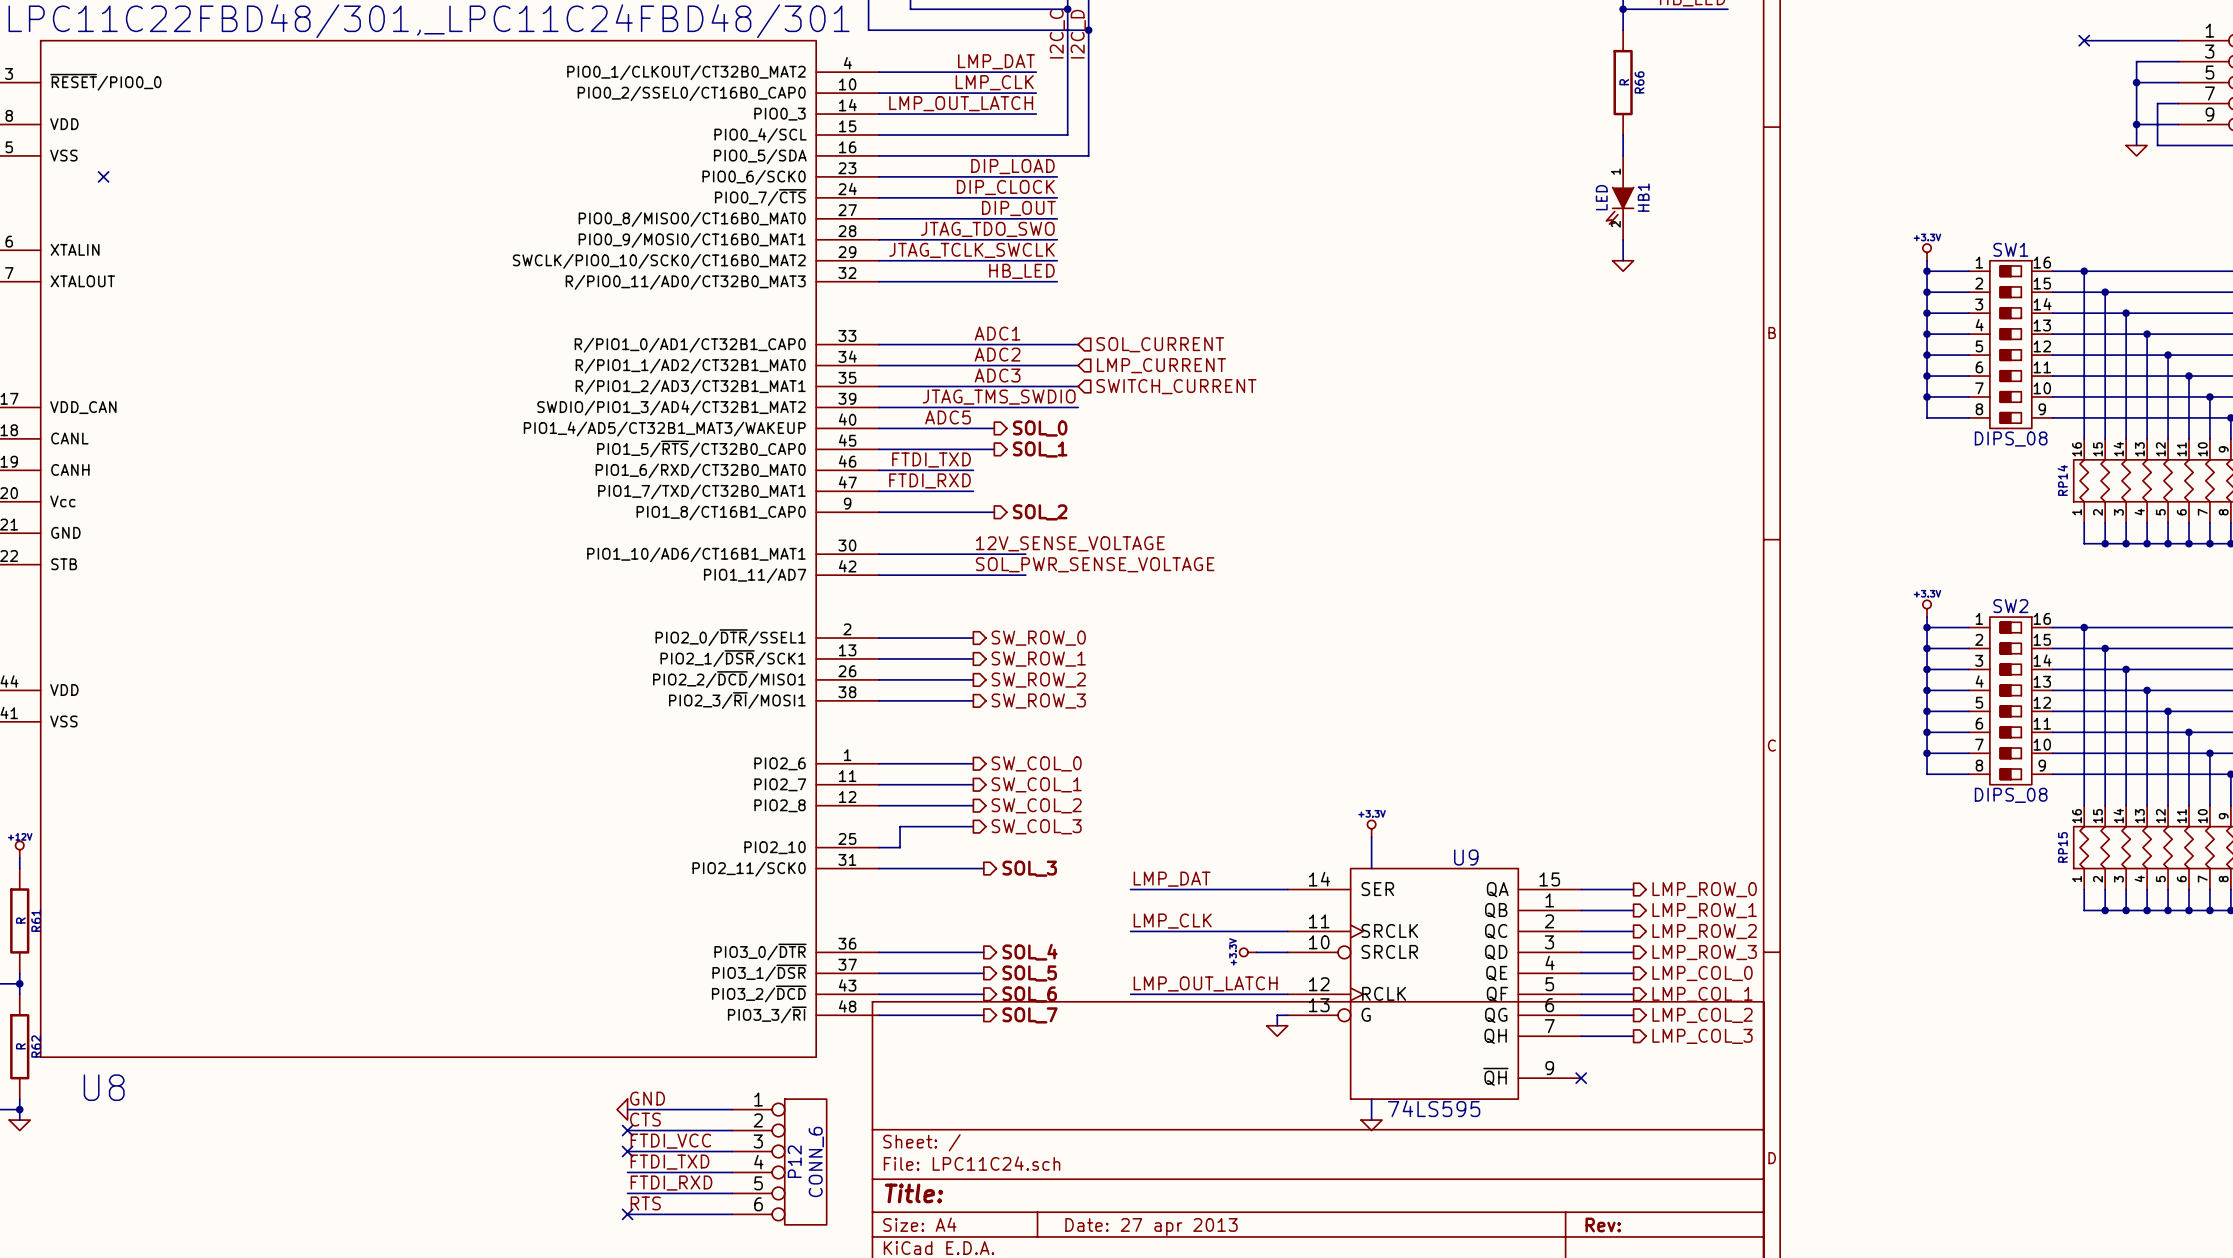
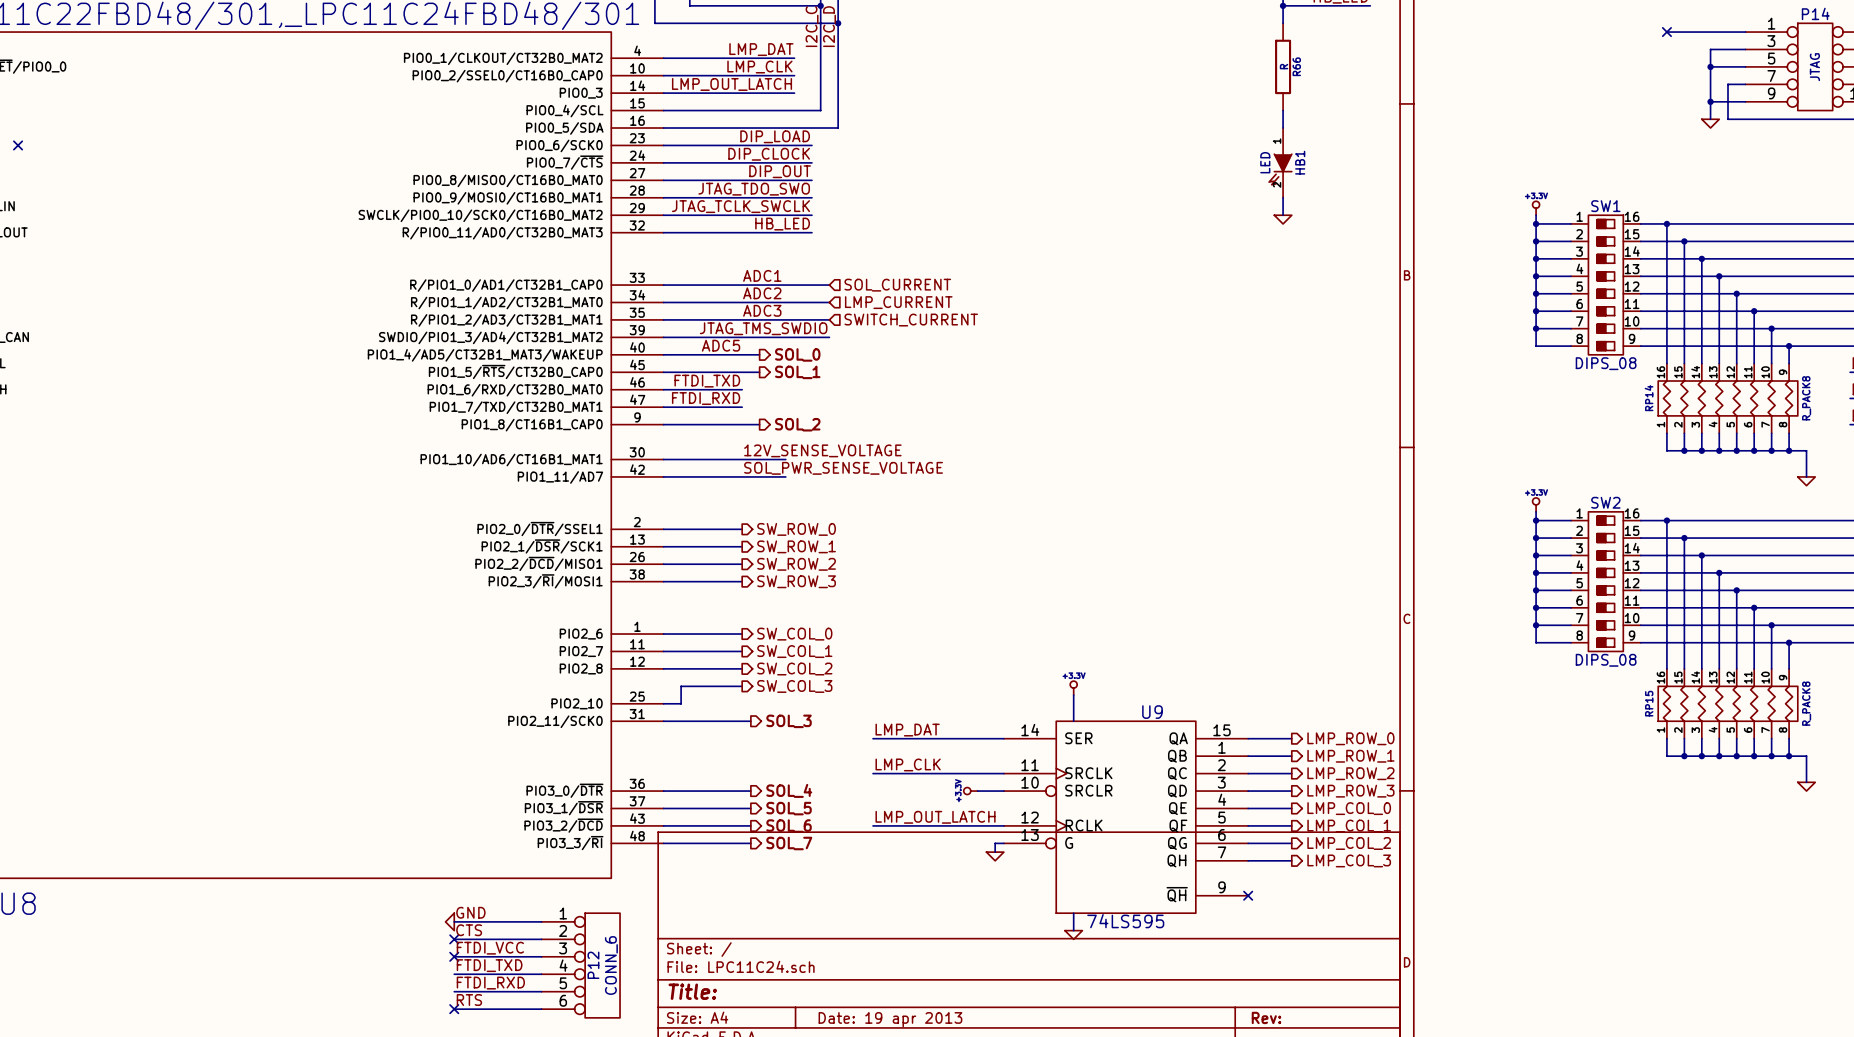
title block: Date: 27 apr 2013 (1151, 1227) -> Date: 19 apr 2013 (890, 1019)

